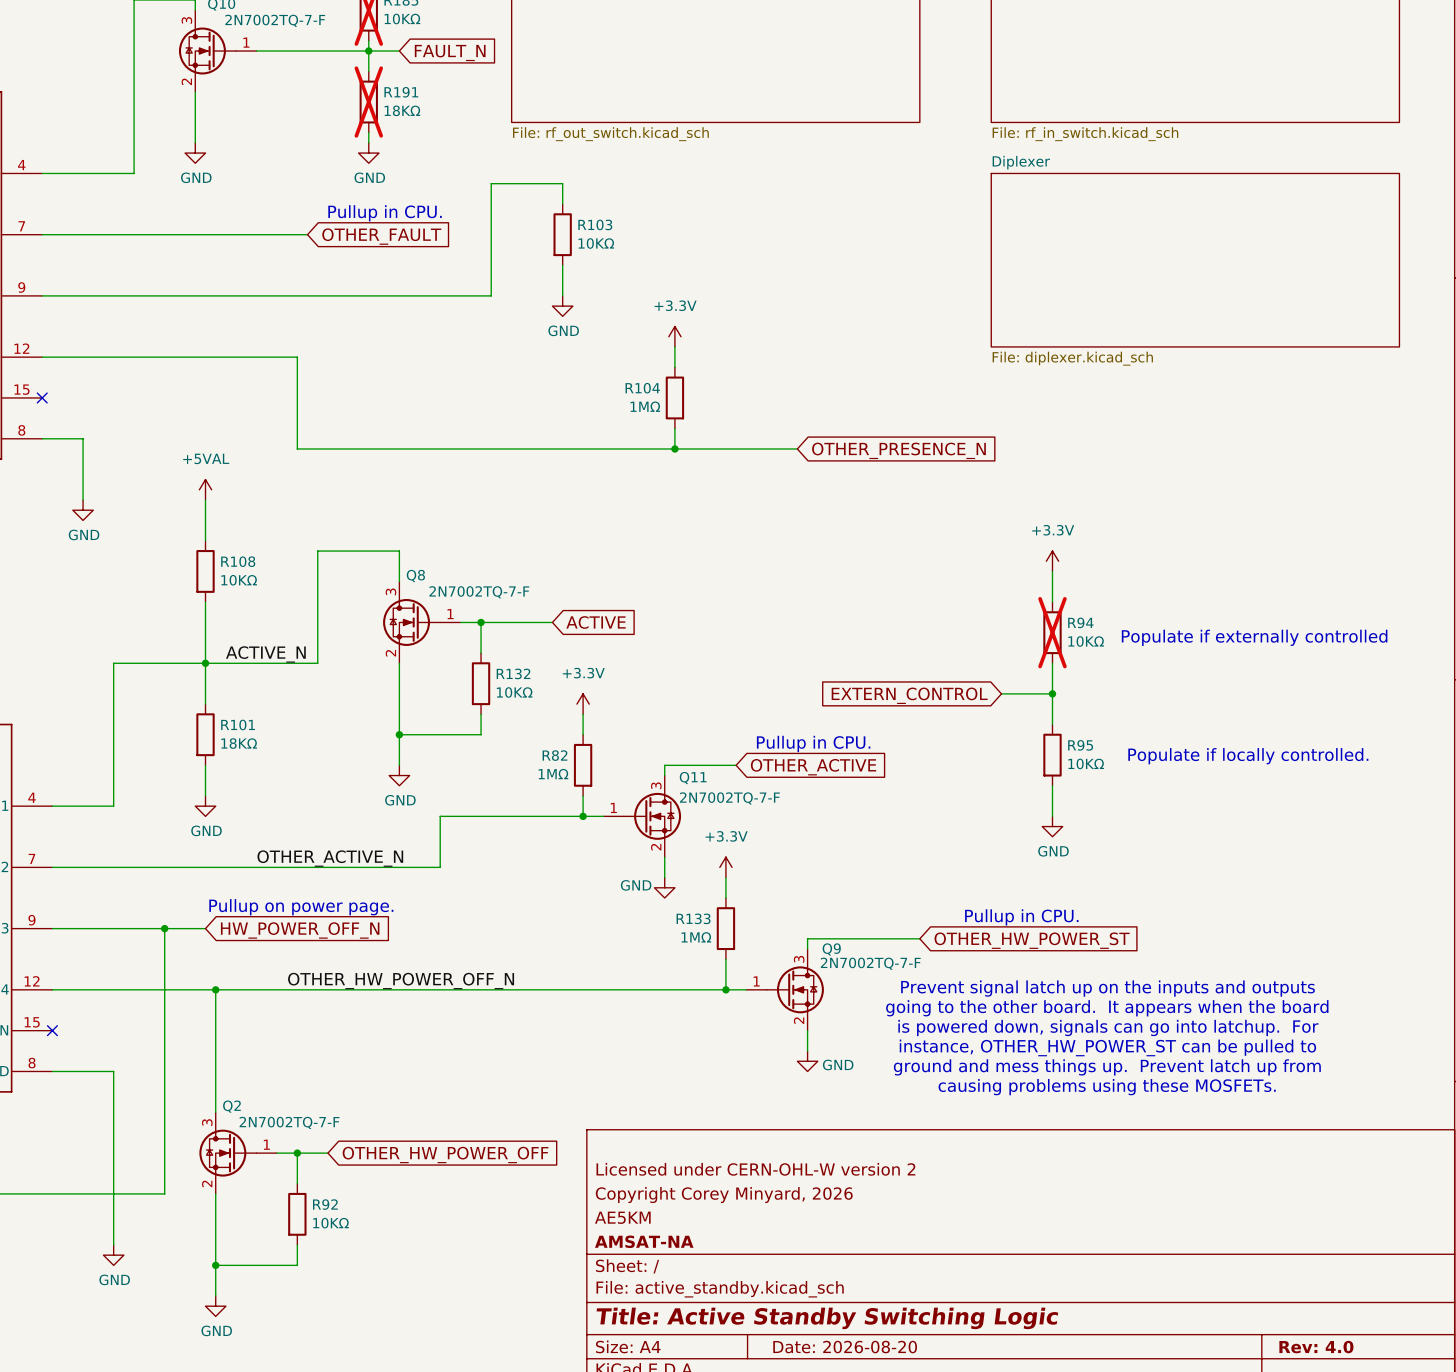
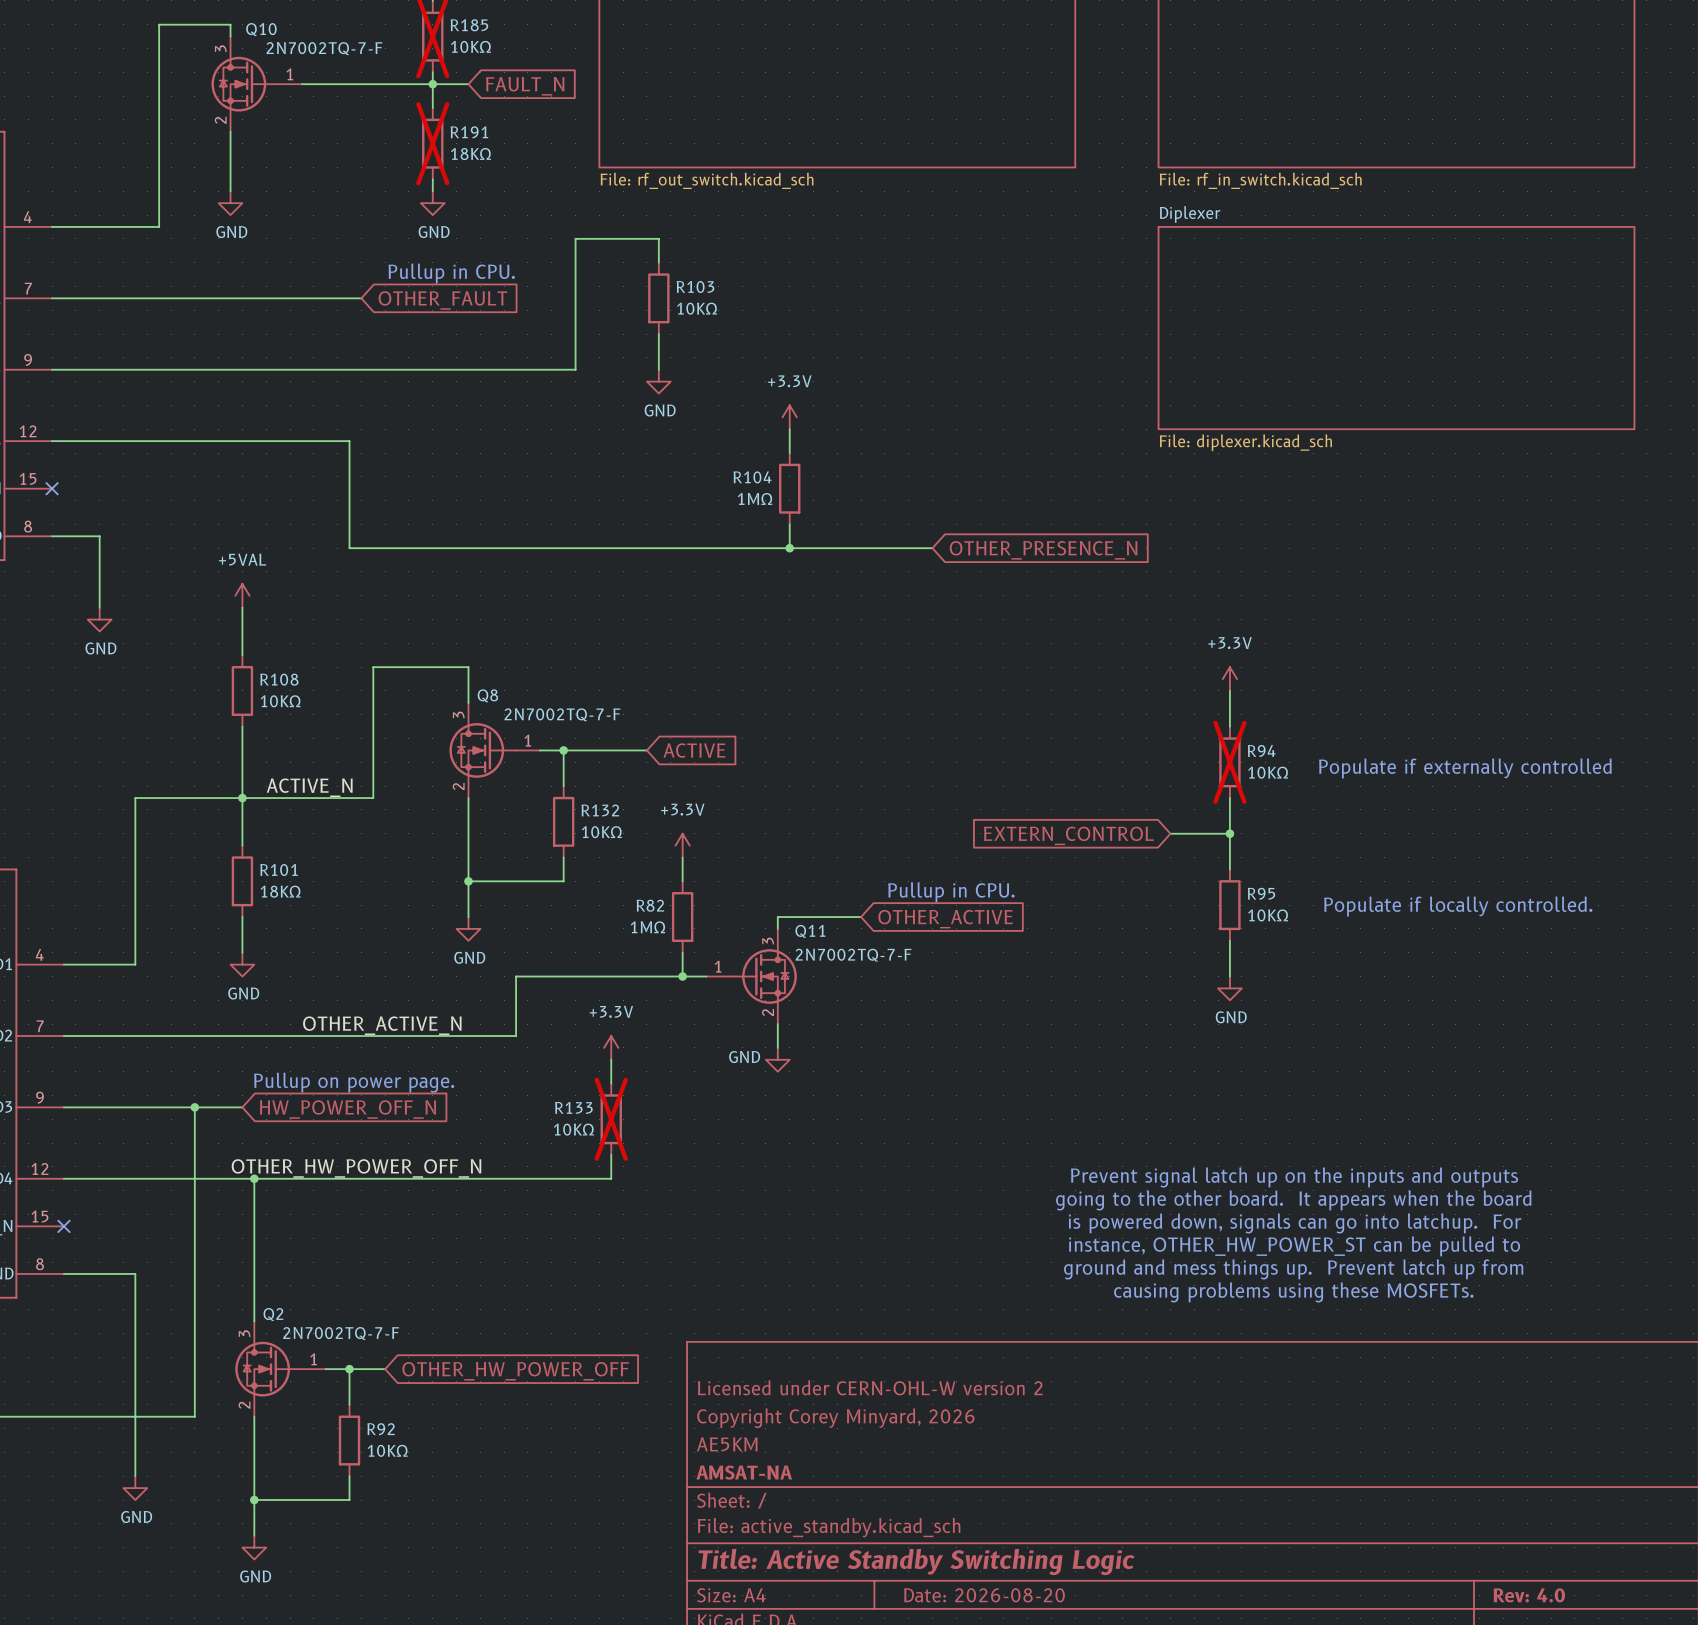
power symbol: +3.3V (725, 867) -> none
power symbol: none -> +3.3V (611, 1047)
wire: (725, 877) (725, 898) -> none
wire: none -> (611, 1059) (611, 1083)
text: Pullup in CPU. (1021, 917) -> none
R133 position: (725, 928) -> (611, 1119)
R133 value: 1MΩ (696, 937) -> 10KΩ (573, 1129)
R133 do-not-place cross: none -> (611, 1119)
wire: (919, 938) (807, 938) (807, 949) -> none
global label: OTHER_HW_POWER_ST (1032, 940) -> none
wire: (725, 959) (725, 989) -> none
label position: OTHER_HW_POWER_OFF_N (401, 981) -> OTHER_HW_POWER_OFF_N (356, 1168)
wire: (521, 989) (746, 989) -> (611, 1178) (611, 1154)
junction: (725, 989) -> none
Q9: 2N7002TQ-7-F (785, 989) -> none
wire: (807, 1030) (807, 1051) -> none
power symbol: GND (807, 1061) -> none

